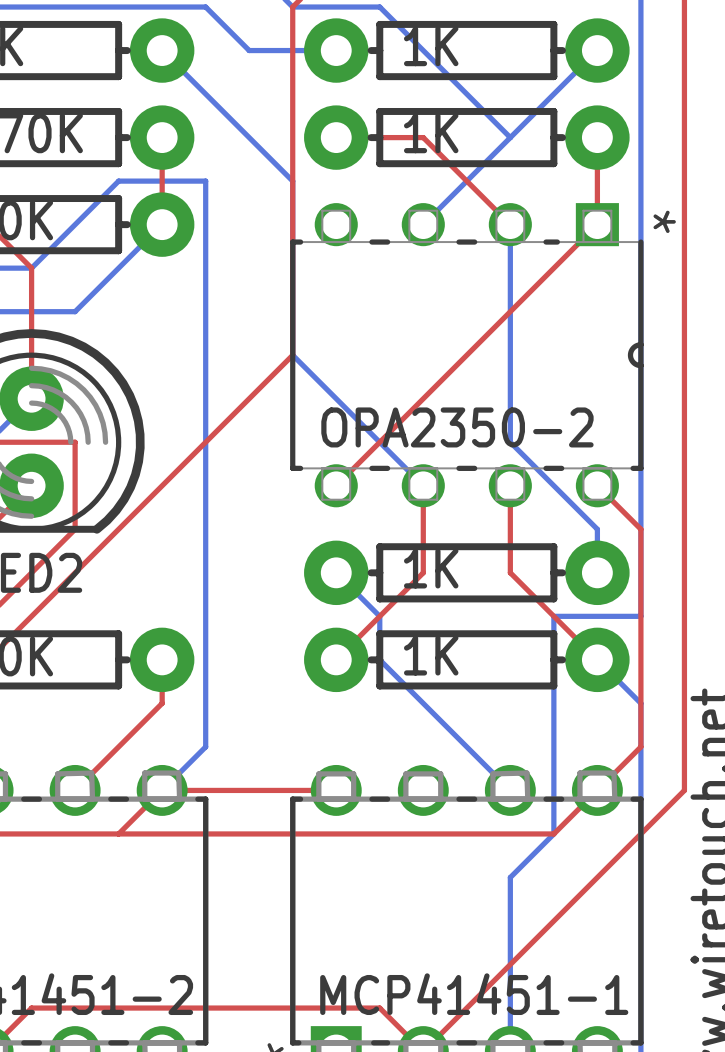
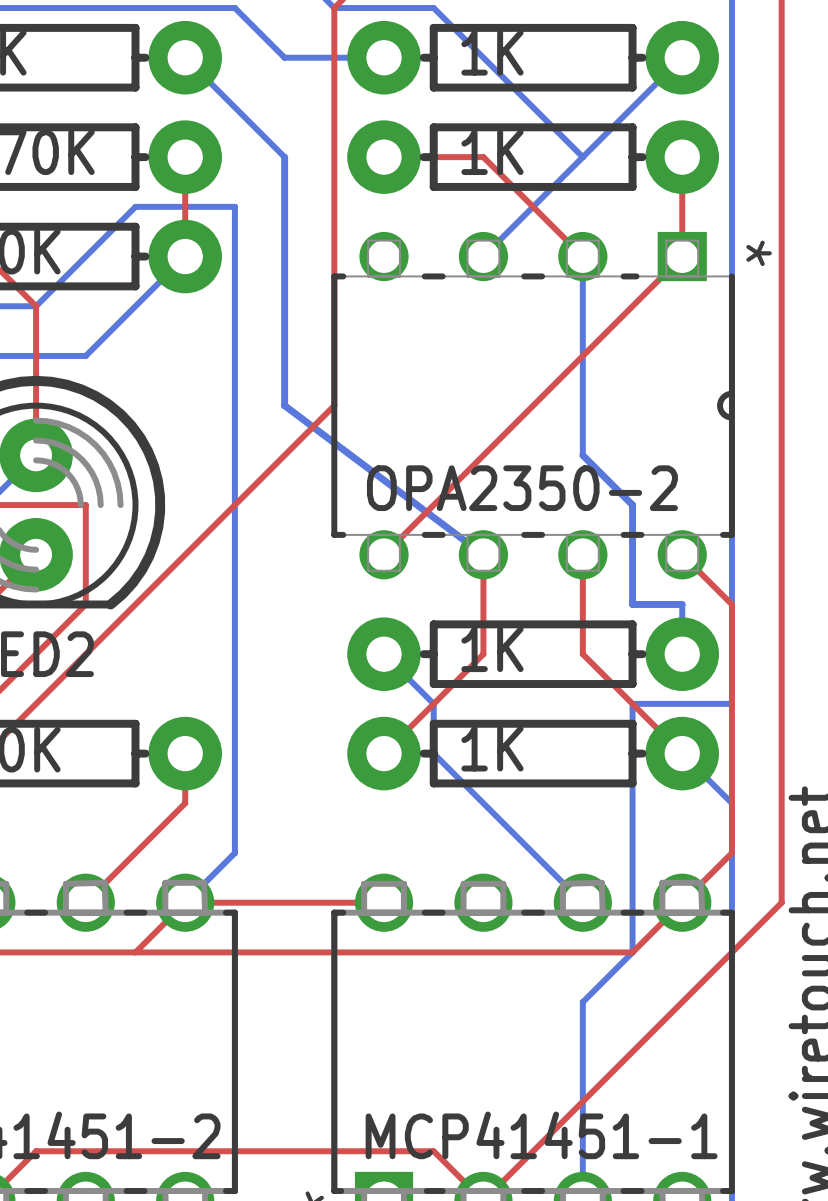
bottom track: (249, 137) (292, 181) (292, 355) (423, 485) -> (284, 157) (284, 405) (483, 554)
bottom track: (510, 398) (510, 442) (597, 529) -> (582, 455) (632, 505) (632, 604) (682, 604)

